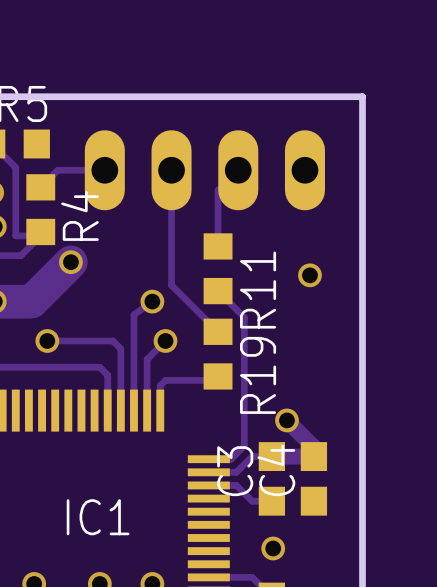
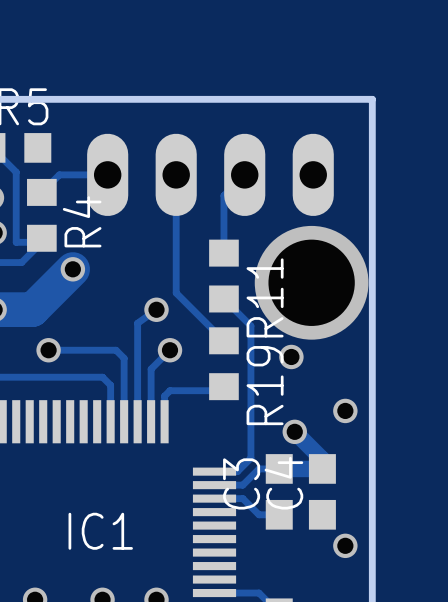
via size: [298, 263, 322, 288] -> [254, 225, 369, 340]
via: none -> (291, 356)
via: none -> (345, 410)
via: none -> (345, 545)
via: (273, 548) -> none

